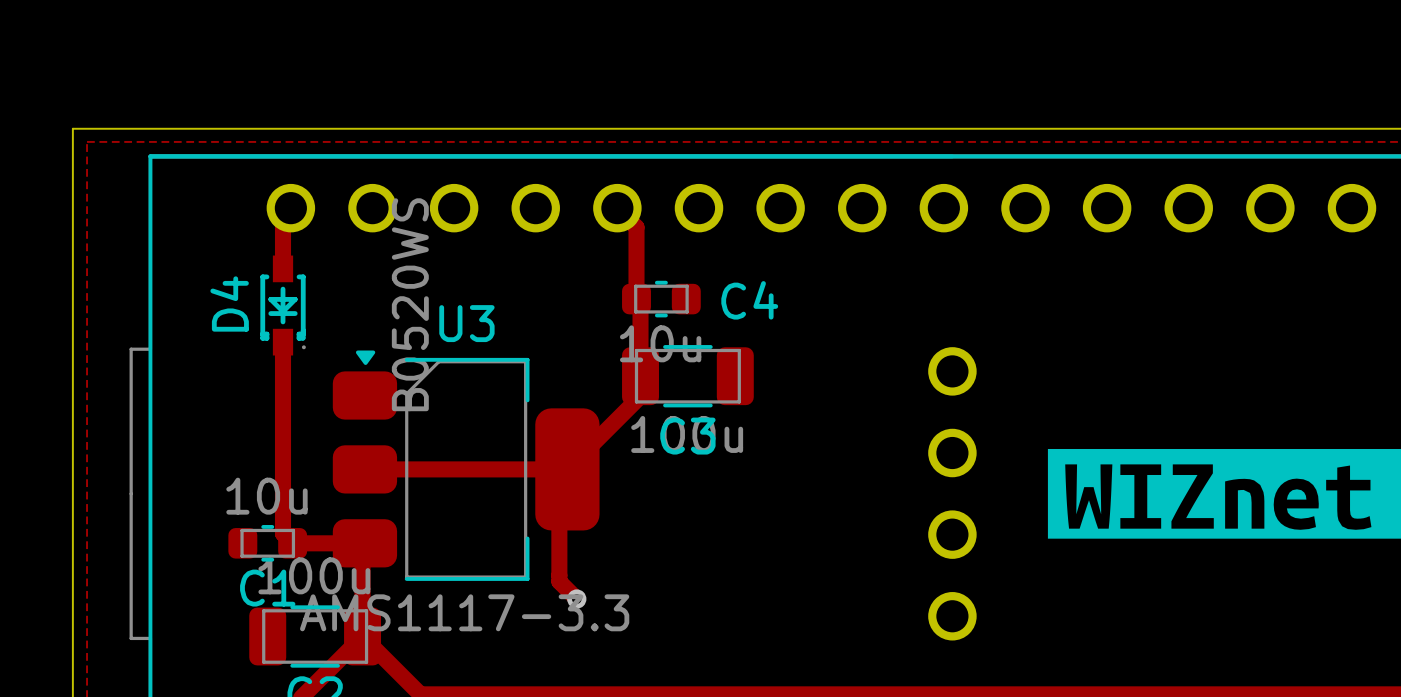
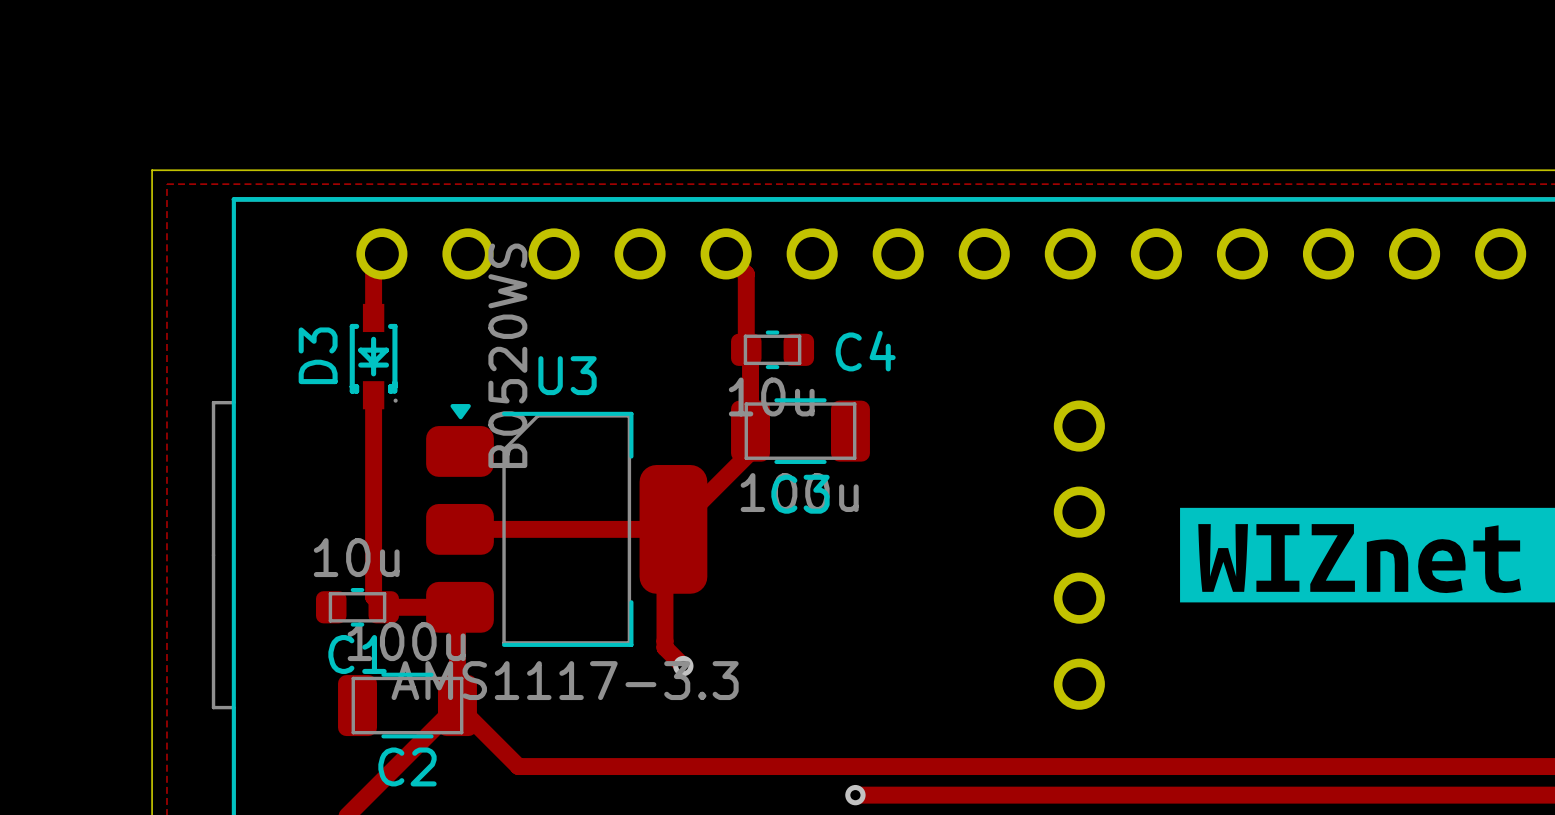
D4 name: D4 (229, 303) -> D3 (318, 355)

